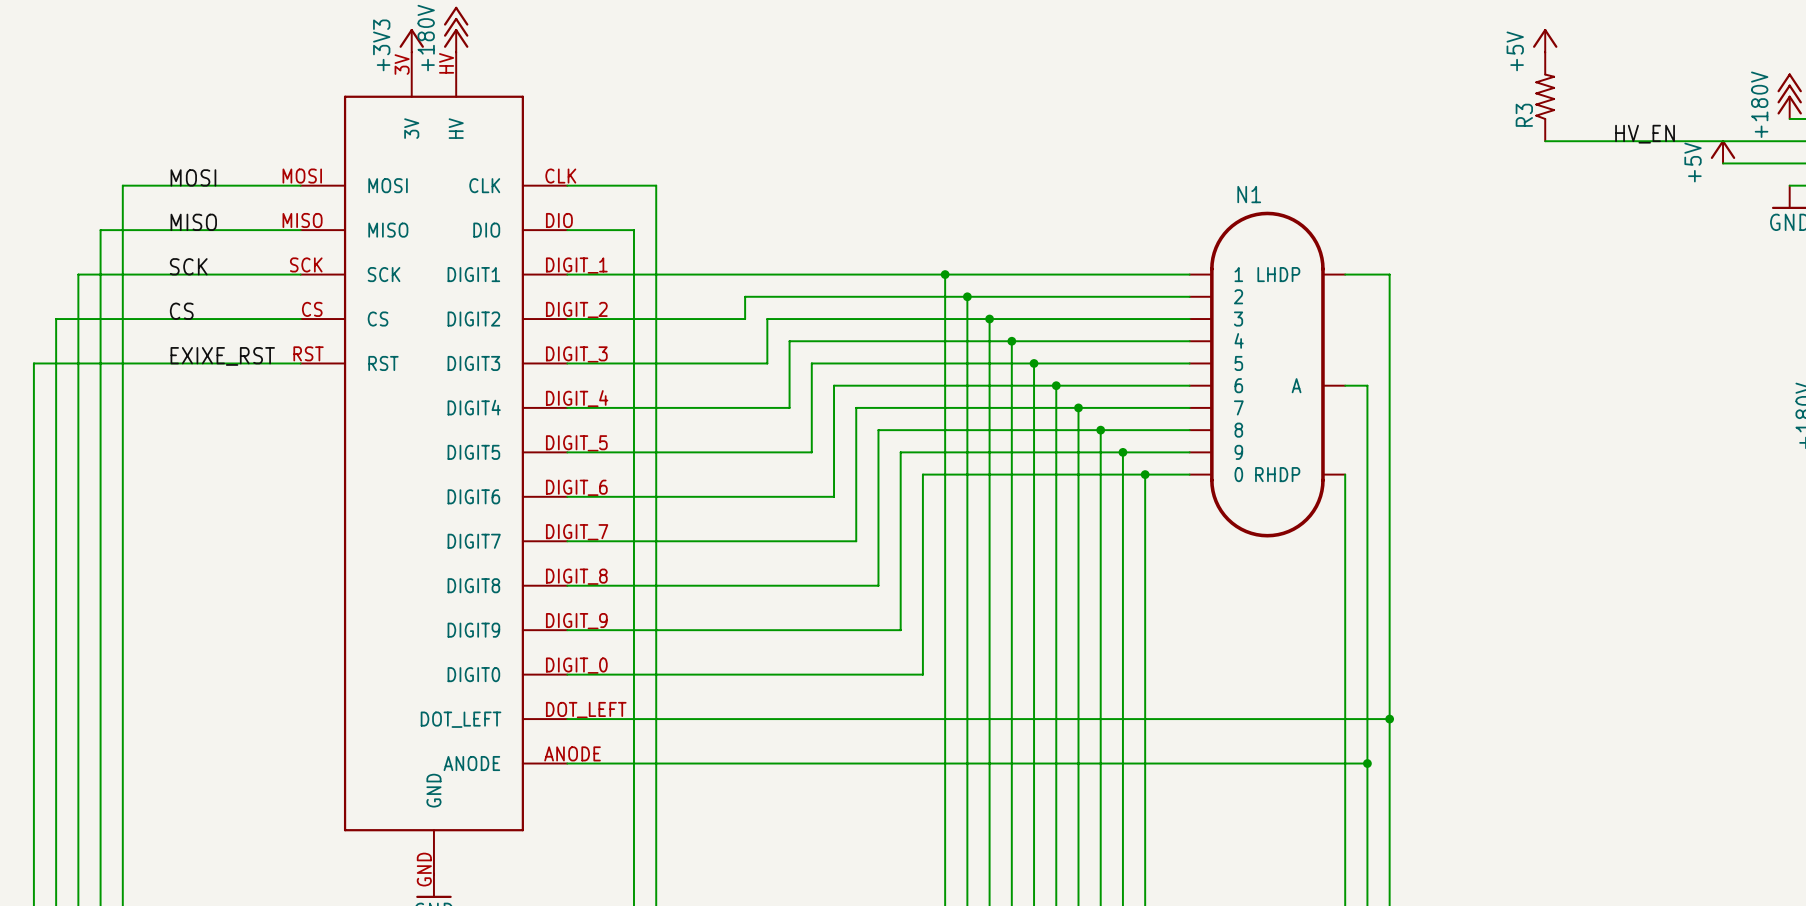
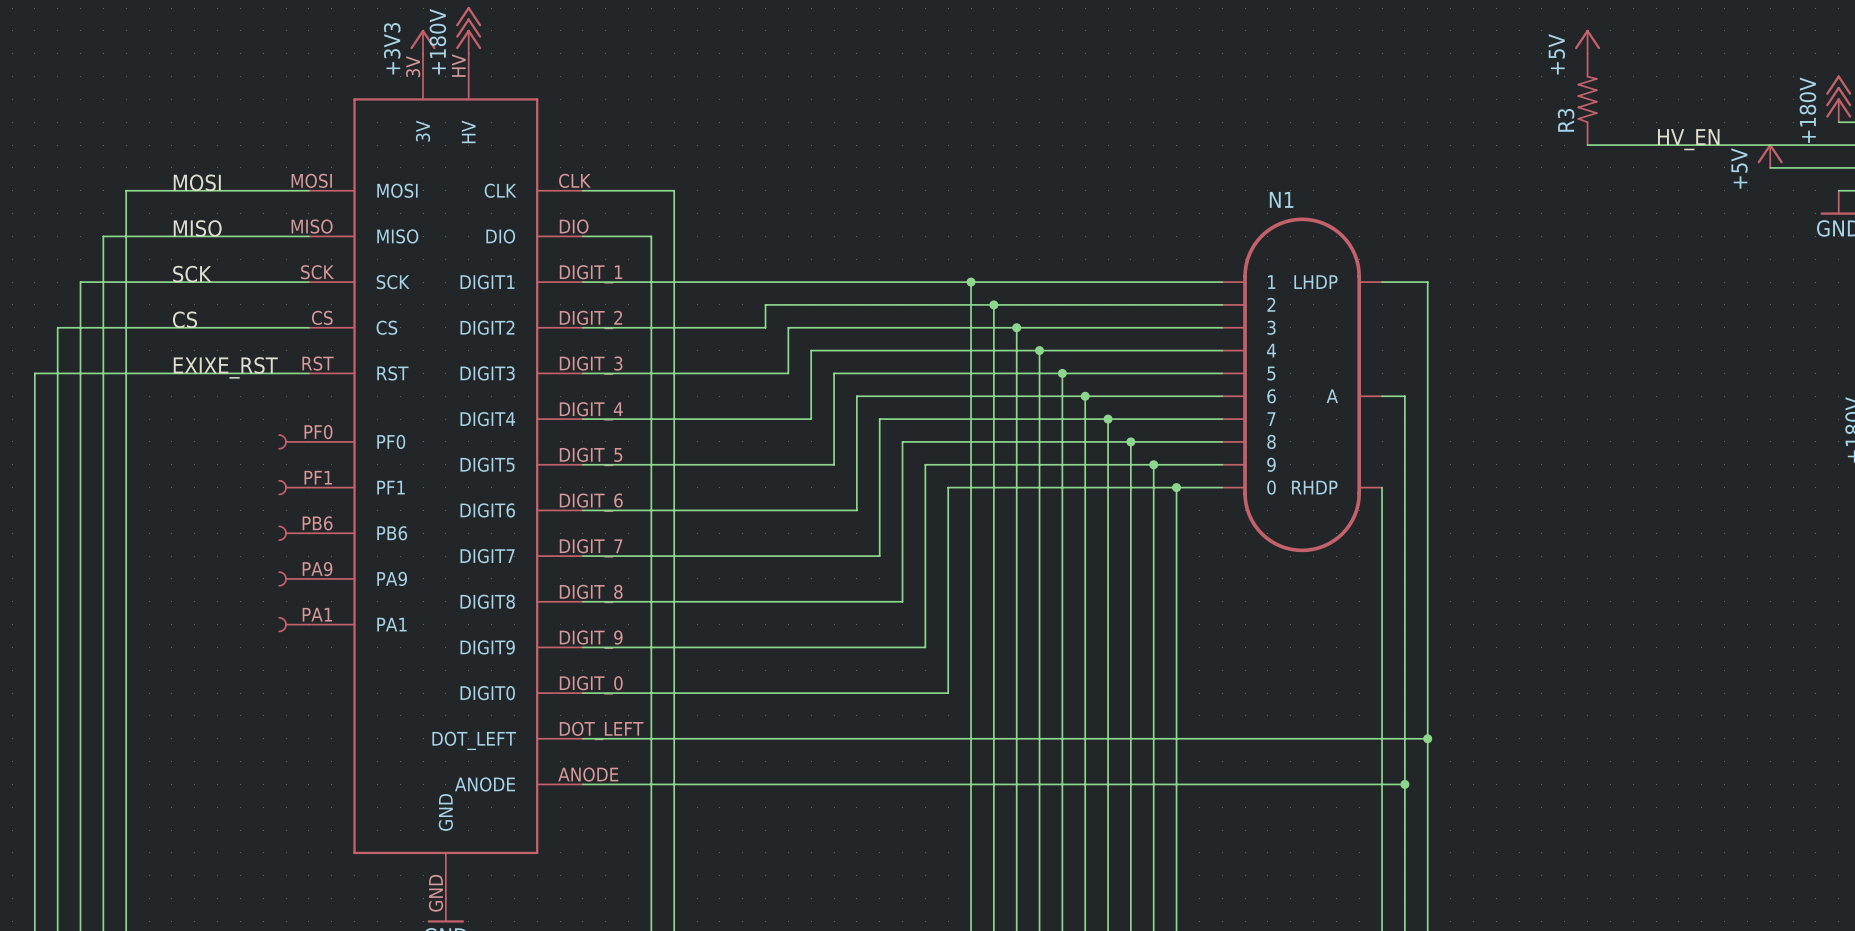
part symbol: [300, 52, 568, 875] -> [308, 53, 583, 899]
part: none -> (294, 441)
part: none -> (294, 487)
part: none -> (294, 533)
part: none -> (294, 578)
part: none -> (294, 624)

